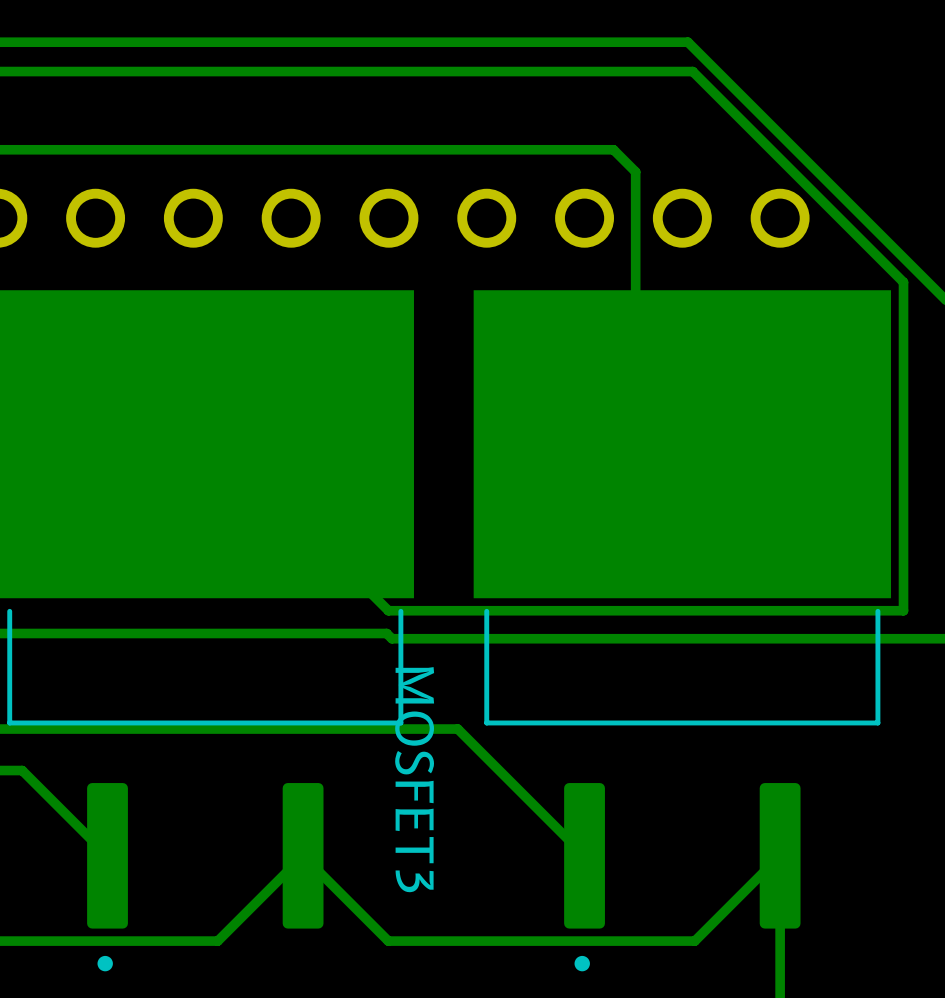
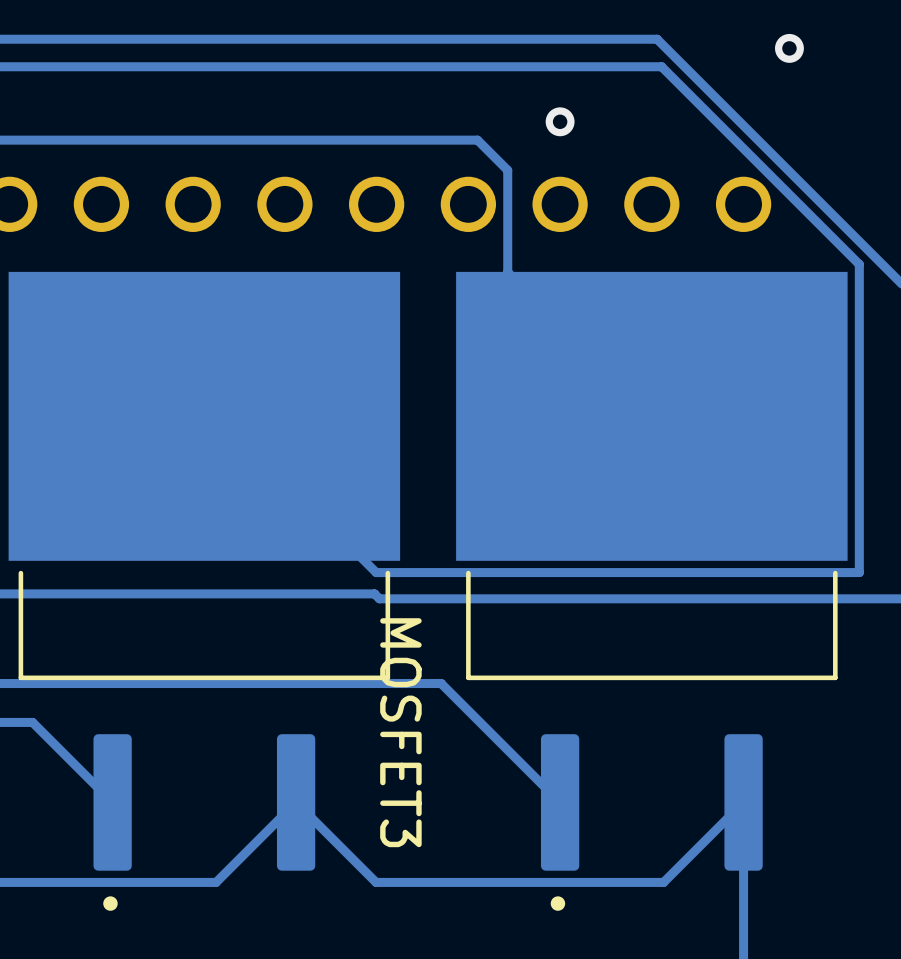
via: none -> (789, 48)
via: none -> (560, 121)
track: (496, 149) (613, 149) (635, 171) (635, 397) -> (477, 140) (507, 170) (507, 272) (608, 372)

